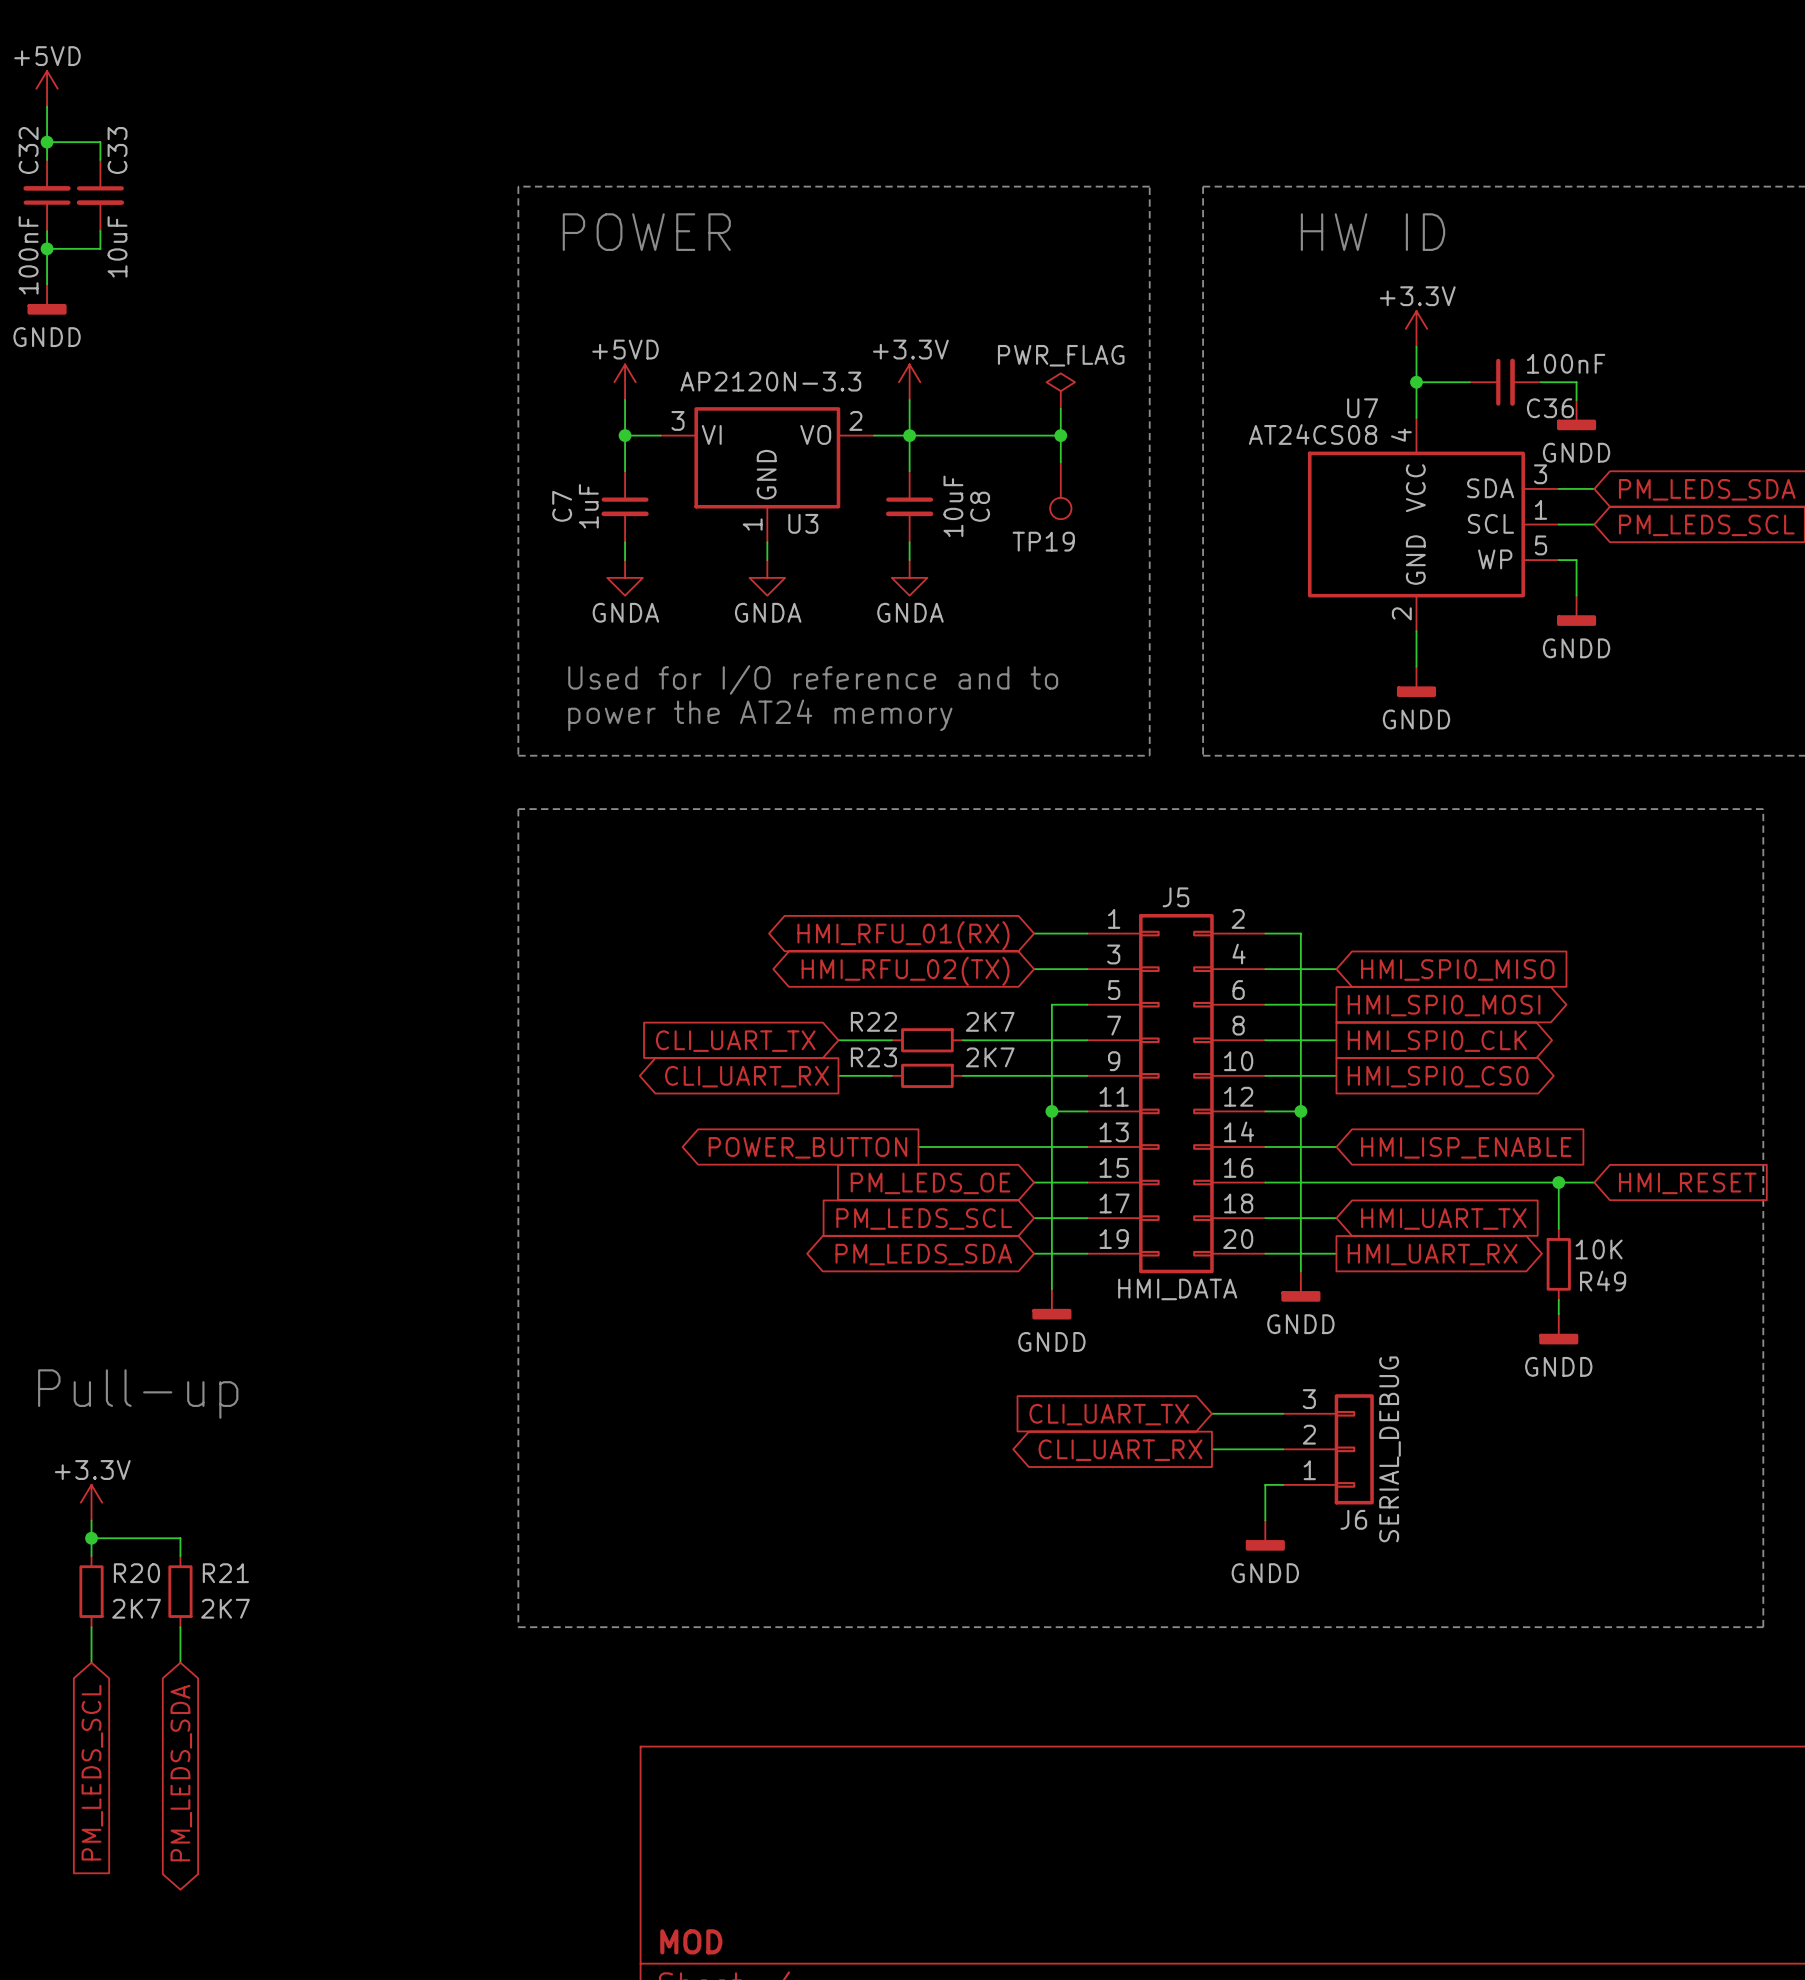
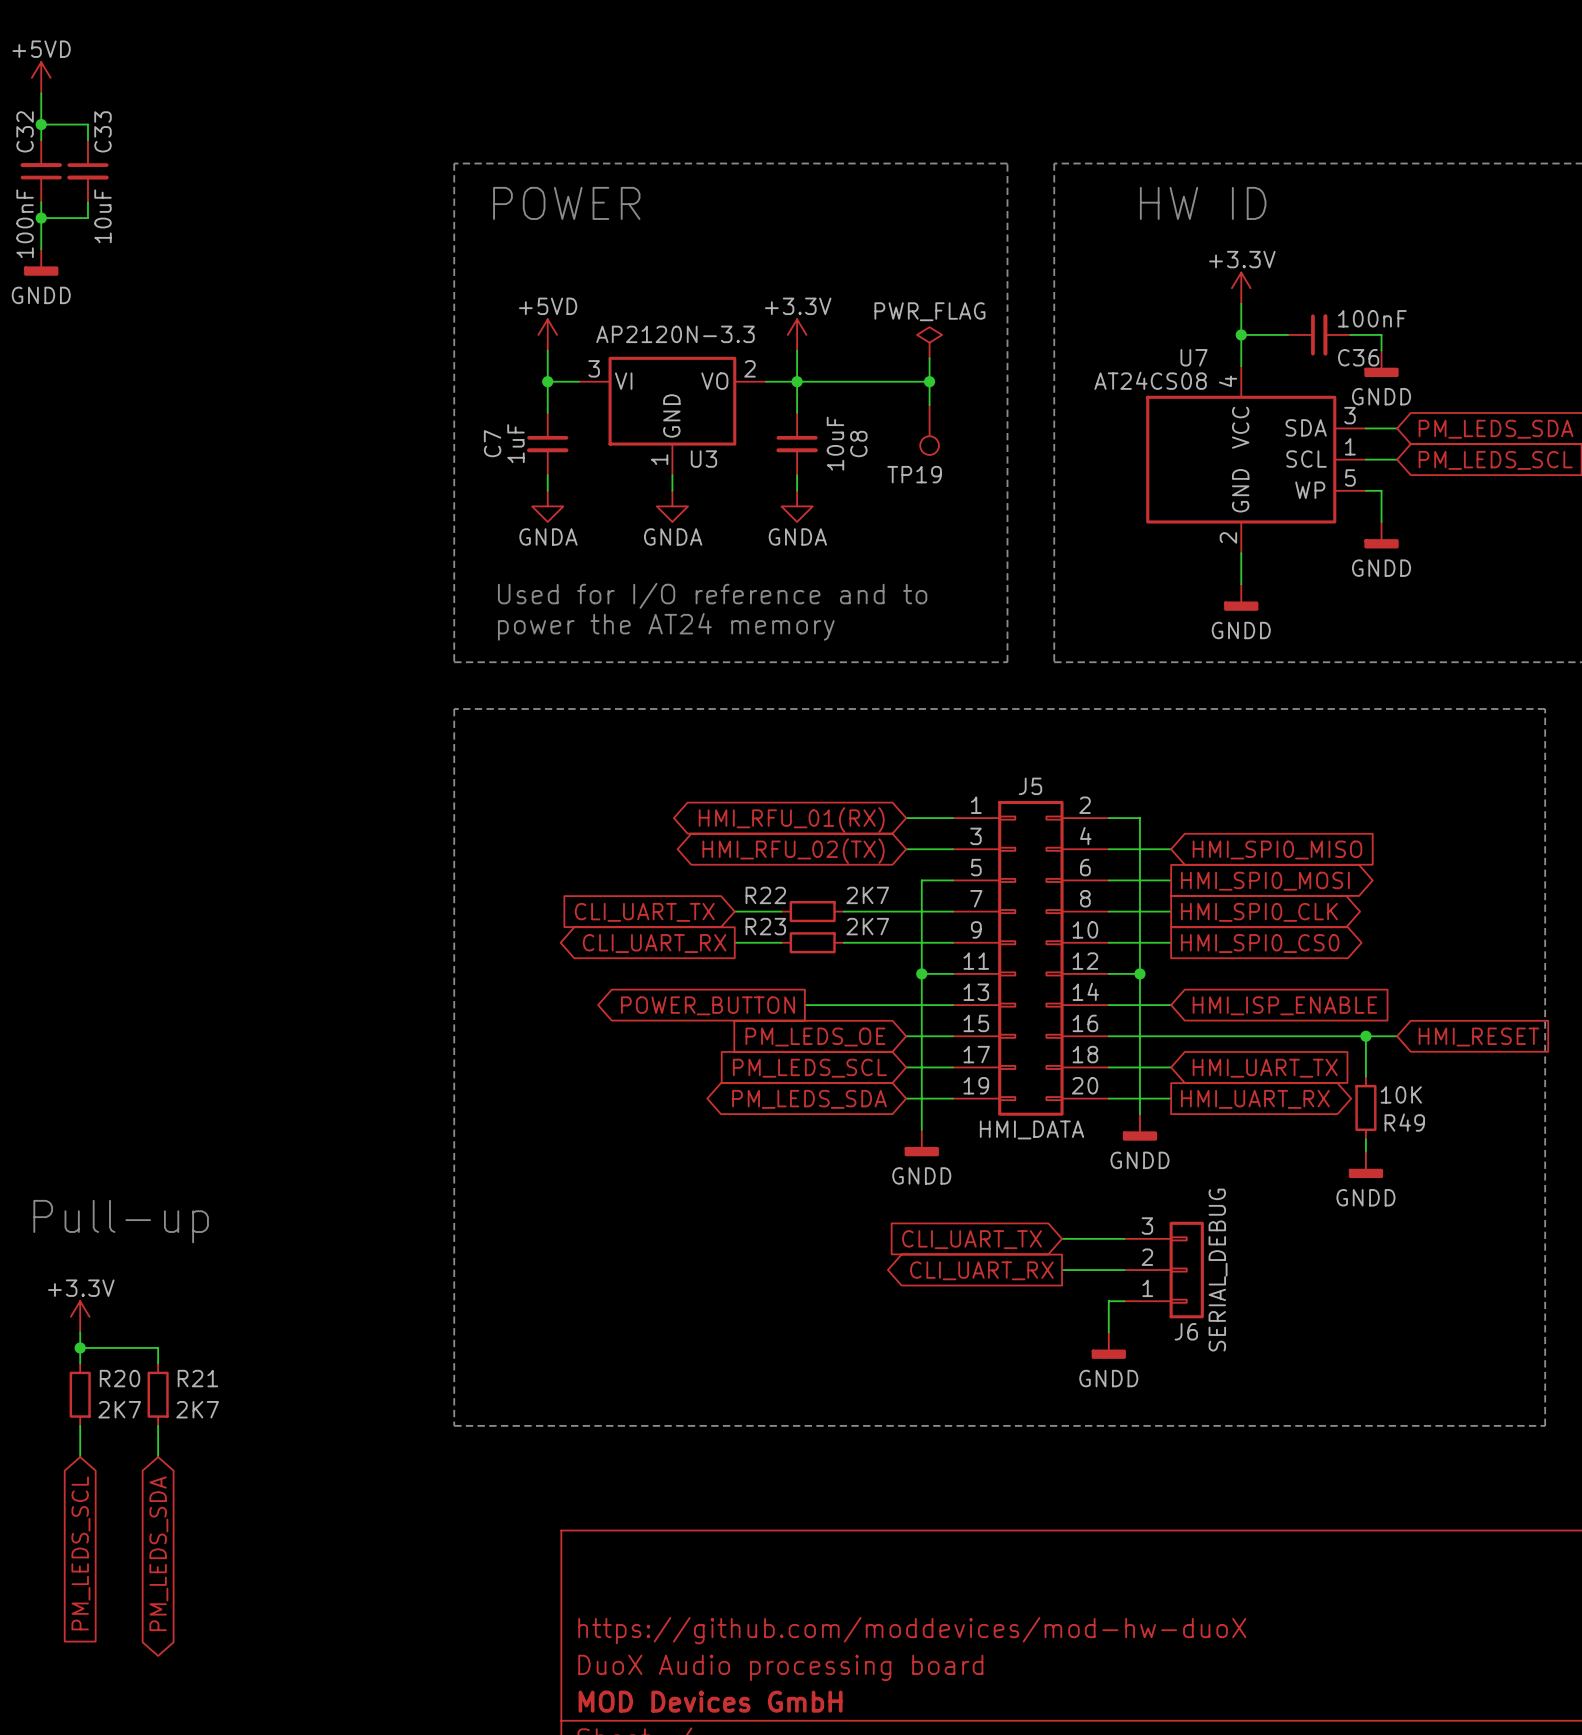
title block: none -> https://github.com/moddevices/mod-hw-duoX (912, 1630)
title block: none -> DuoX Audio processing board (780, 1667)
title block: MOD (691, 1941) -> MOD Devices GmbH (710, 1701)

